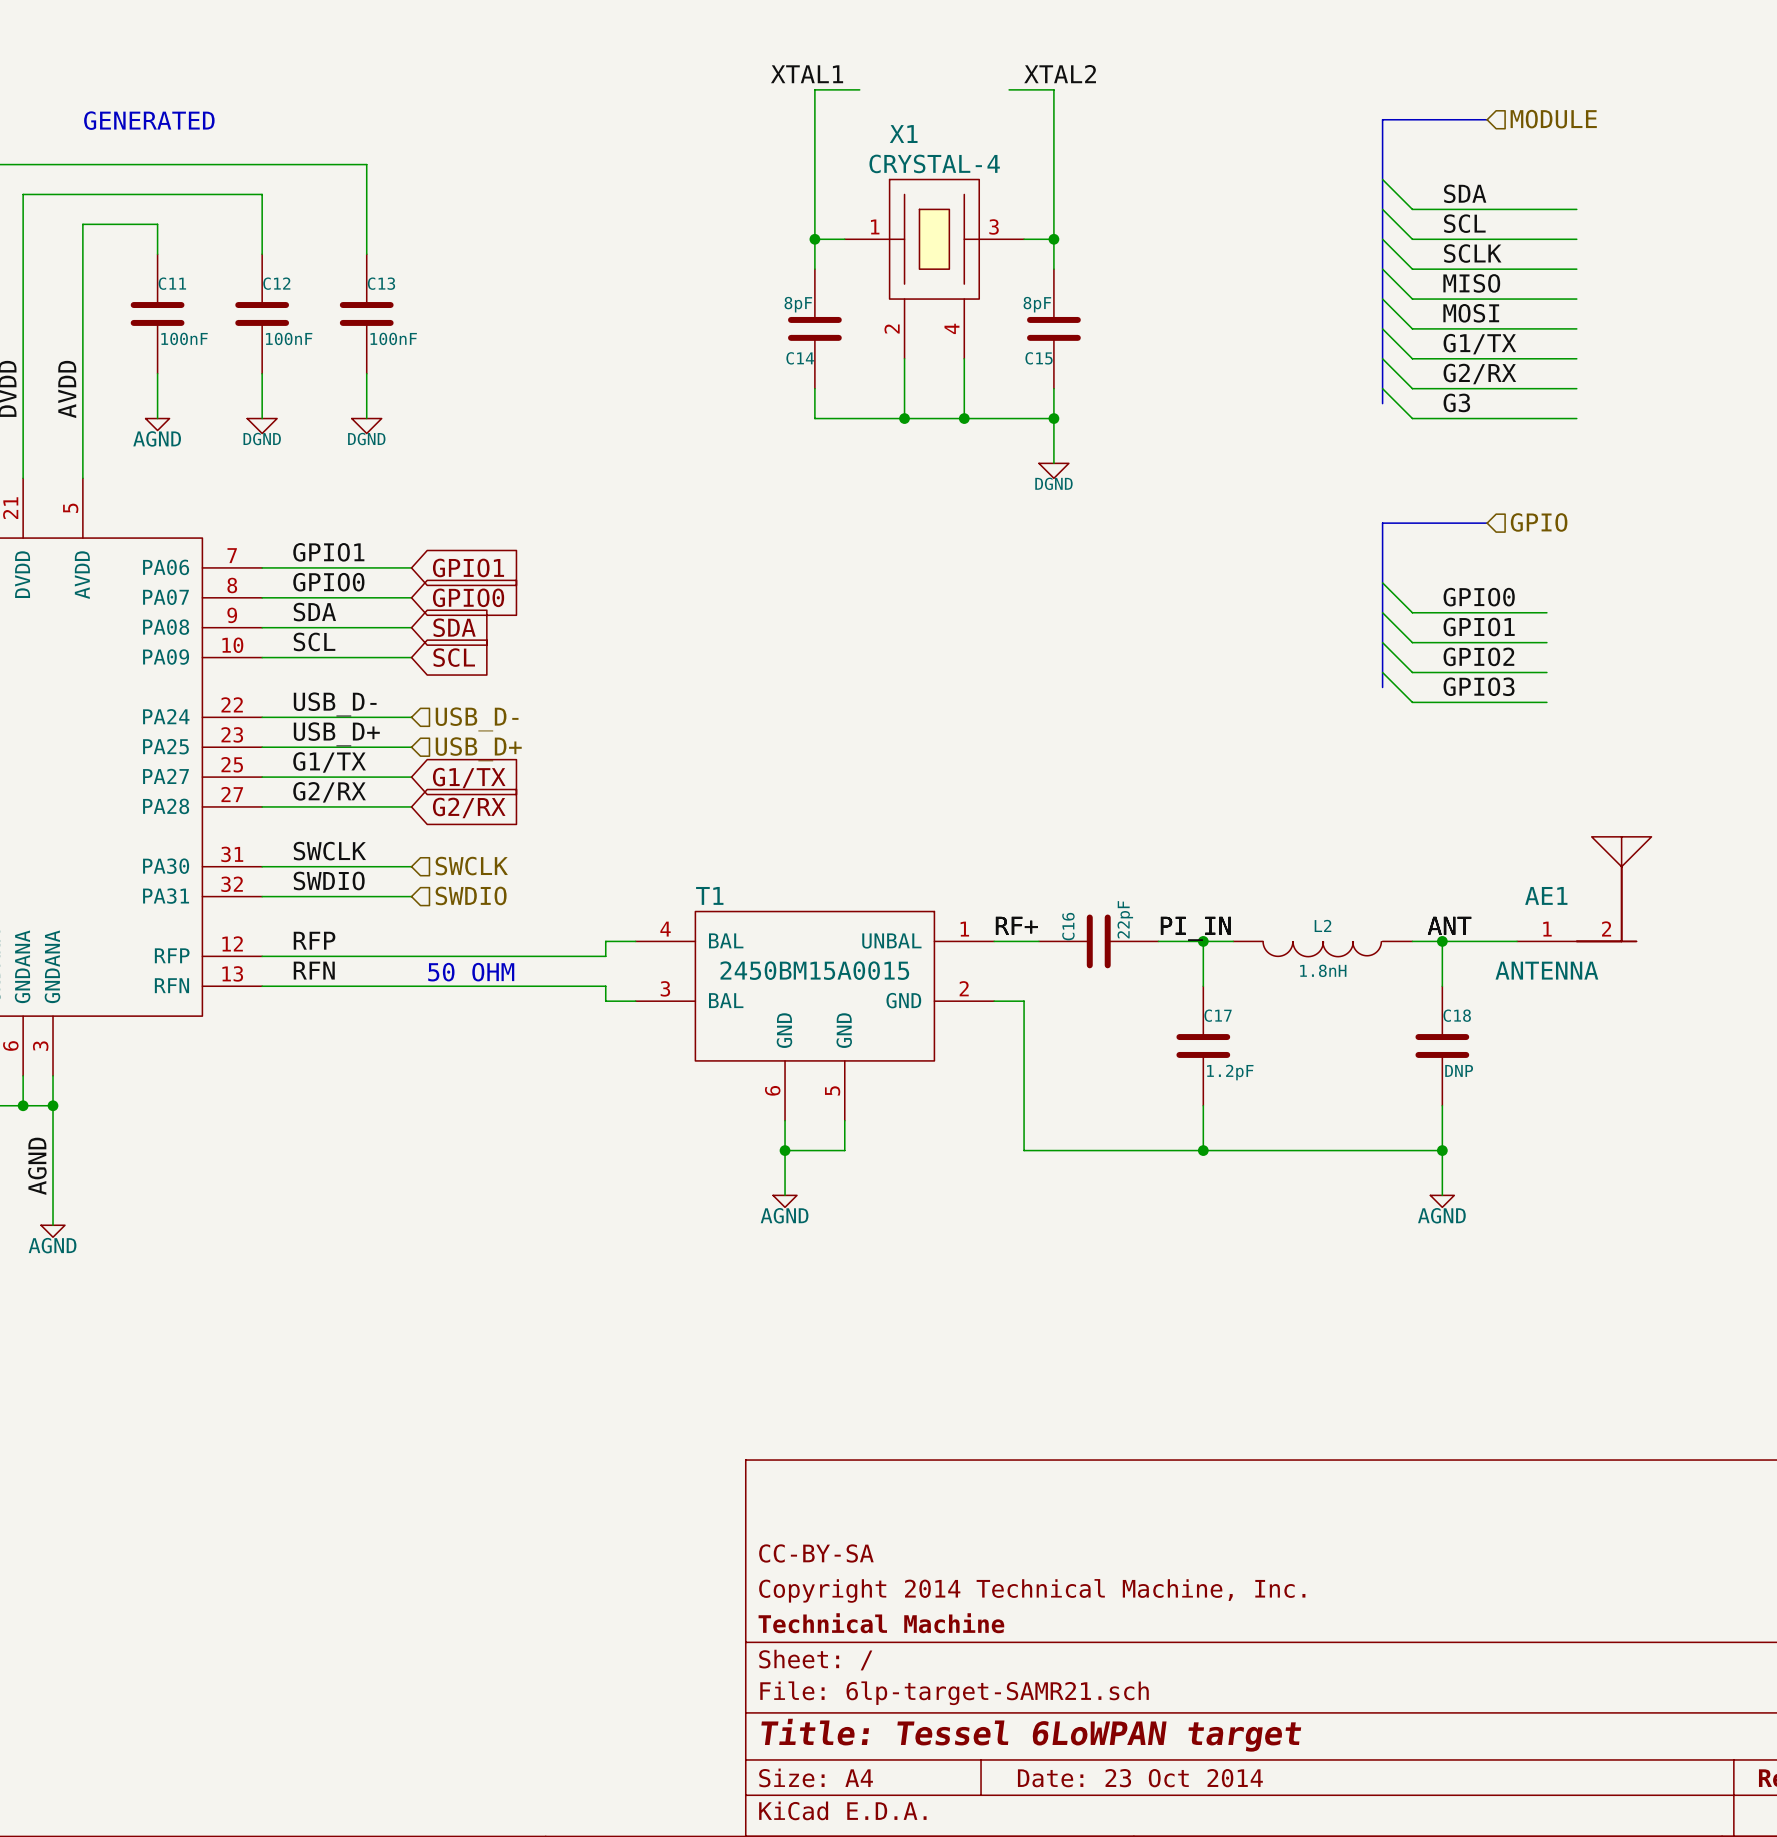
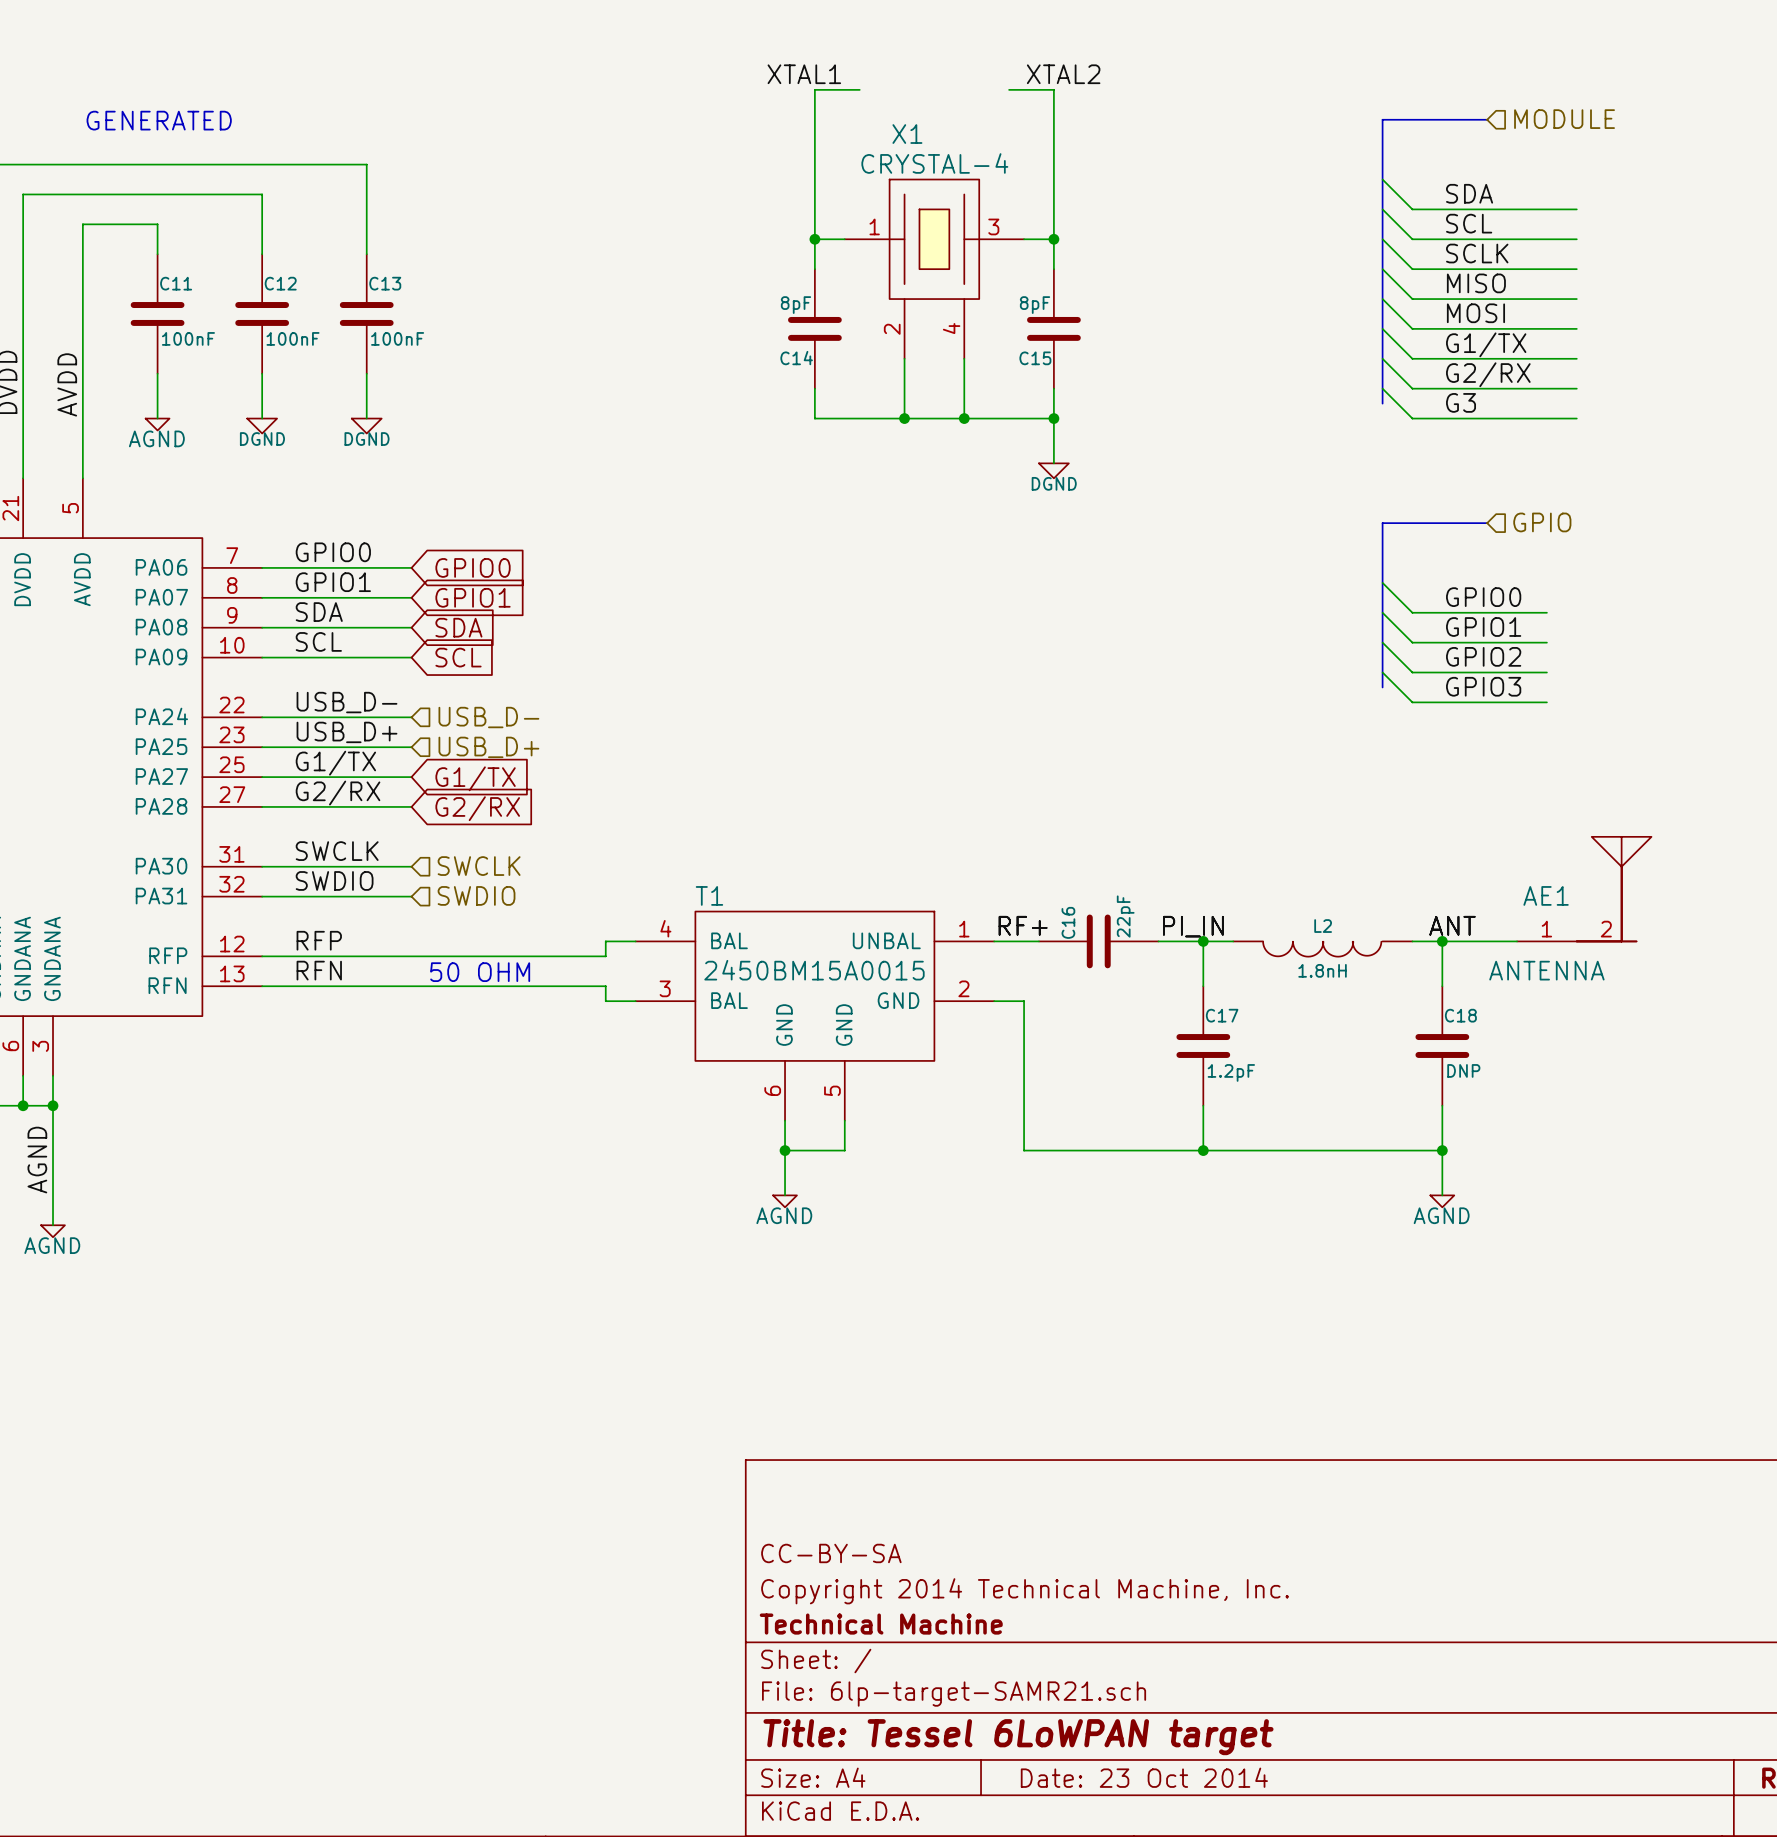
label: GPIO1 (328, 552) -> GPIO0 (333, 552)
global label: GPIO1 (468, 567) -> GPIO0 (473, 567)
label: GPIO0 (328, 582) -> GPIO1 (333, 582)
global label: GPIO0 (468, 597) -> GPIO1 (473, 597)

